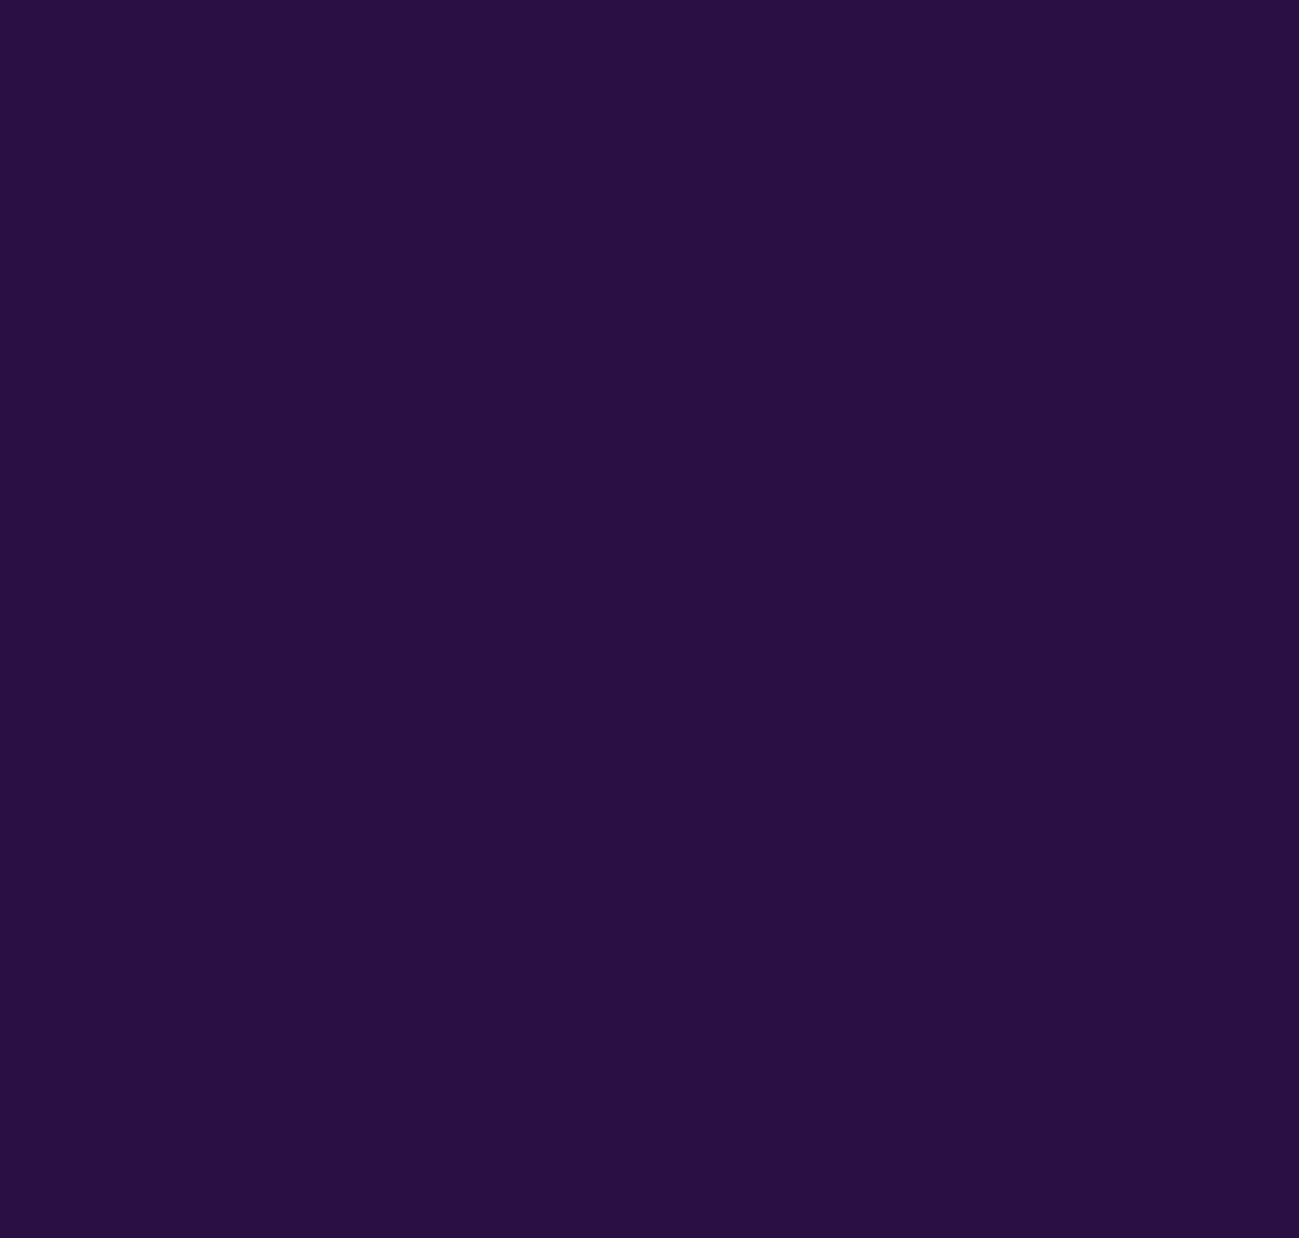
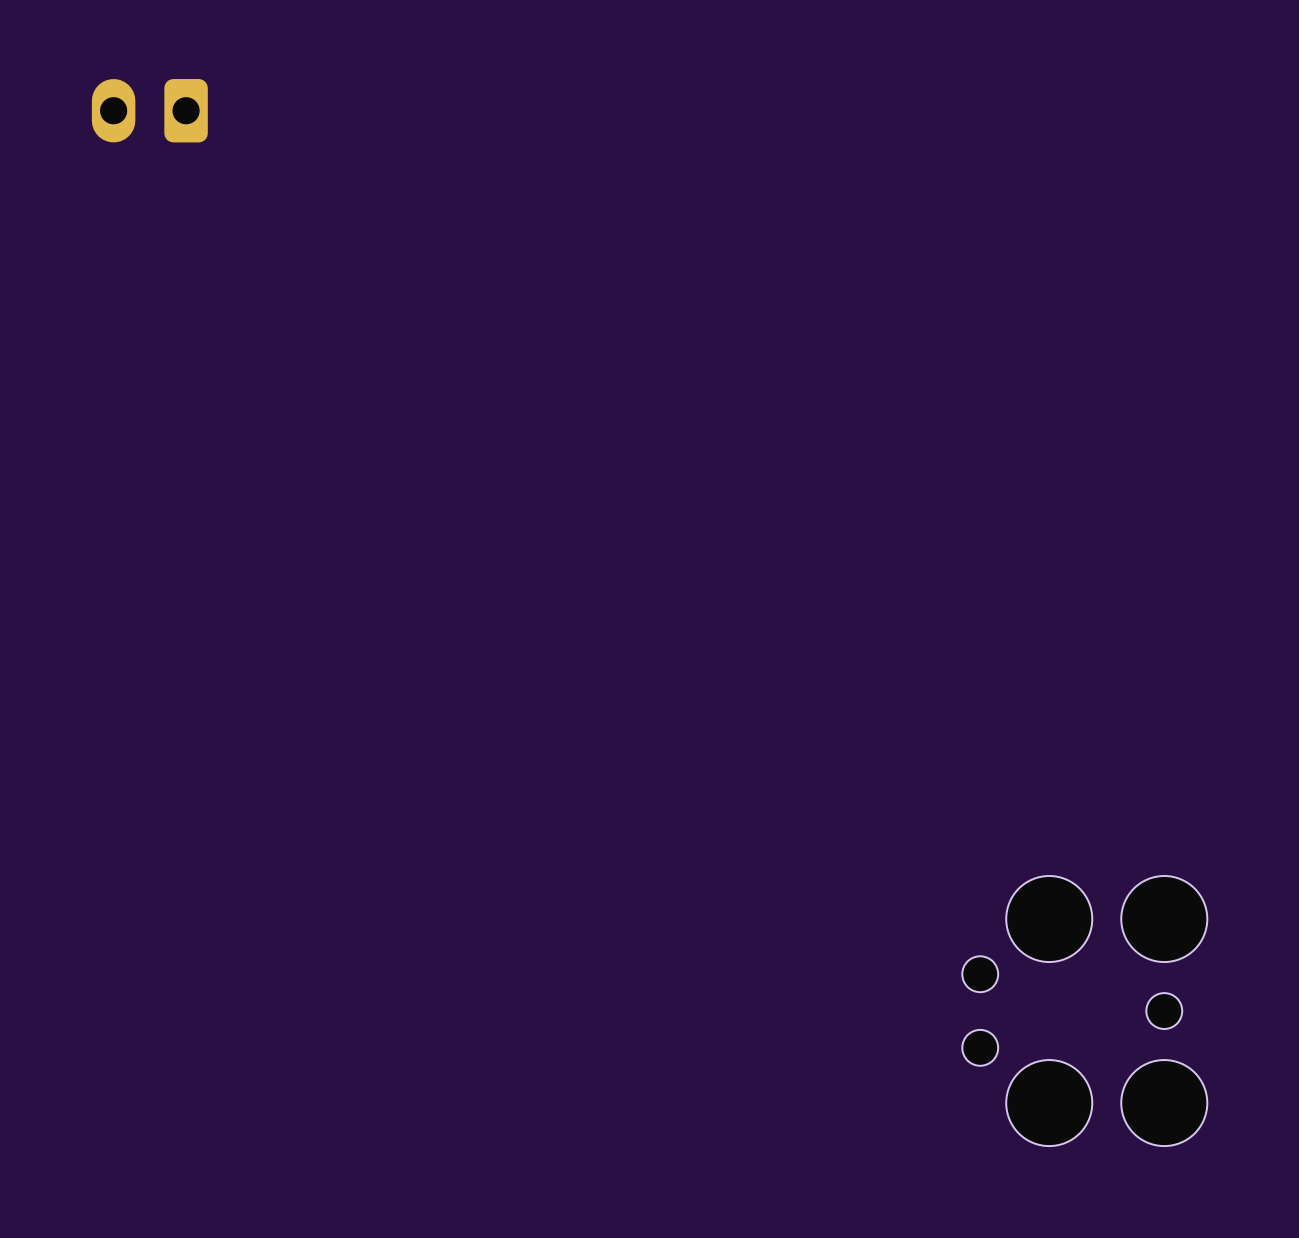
part: none -> (149, 110)
part: none -> (1084, 1011)

